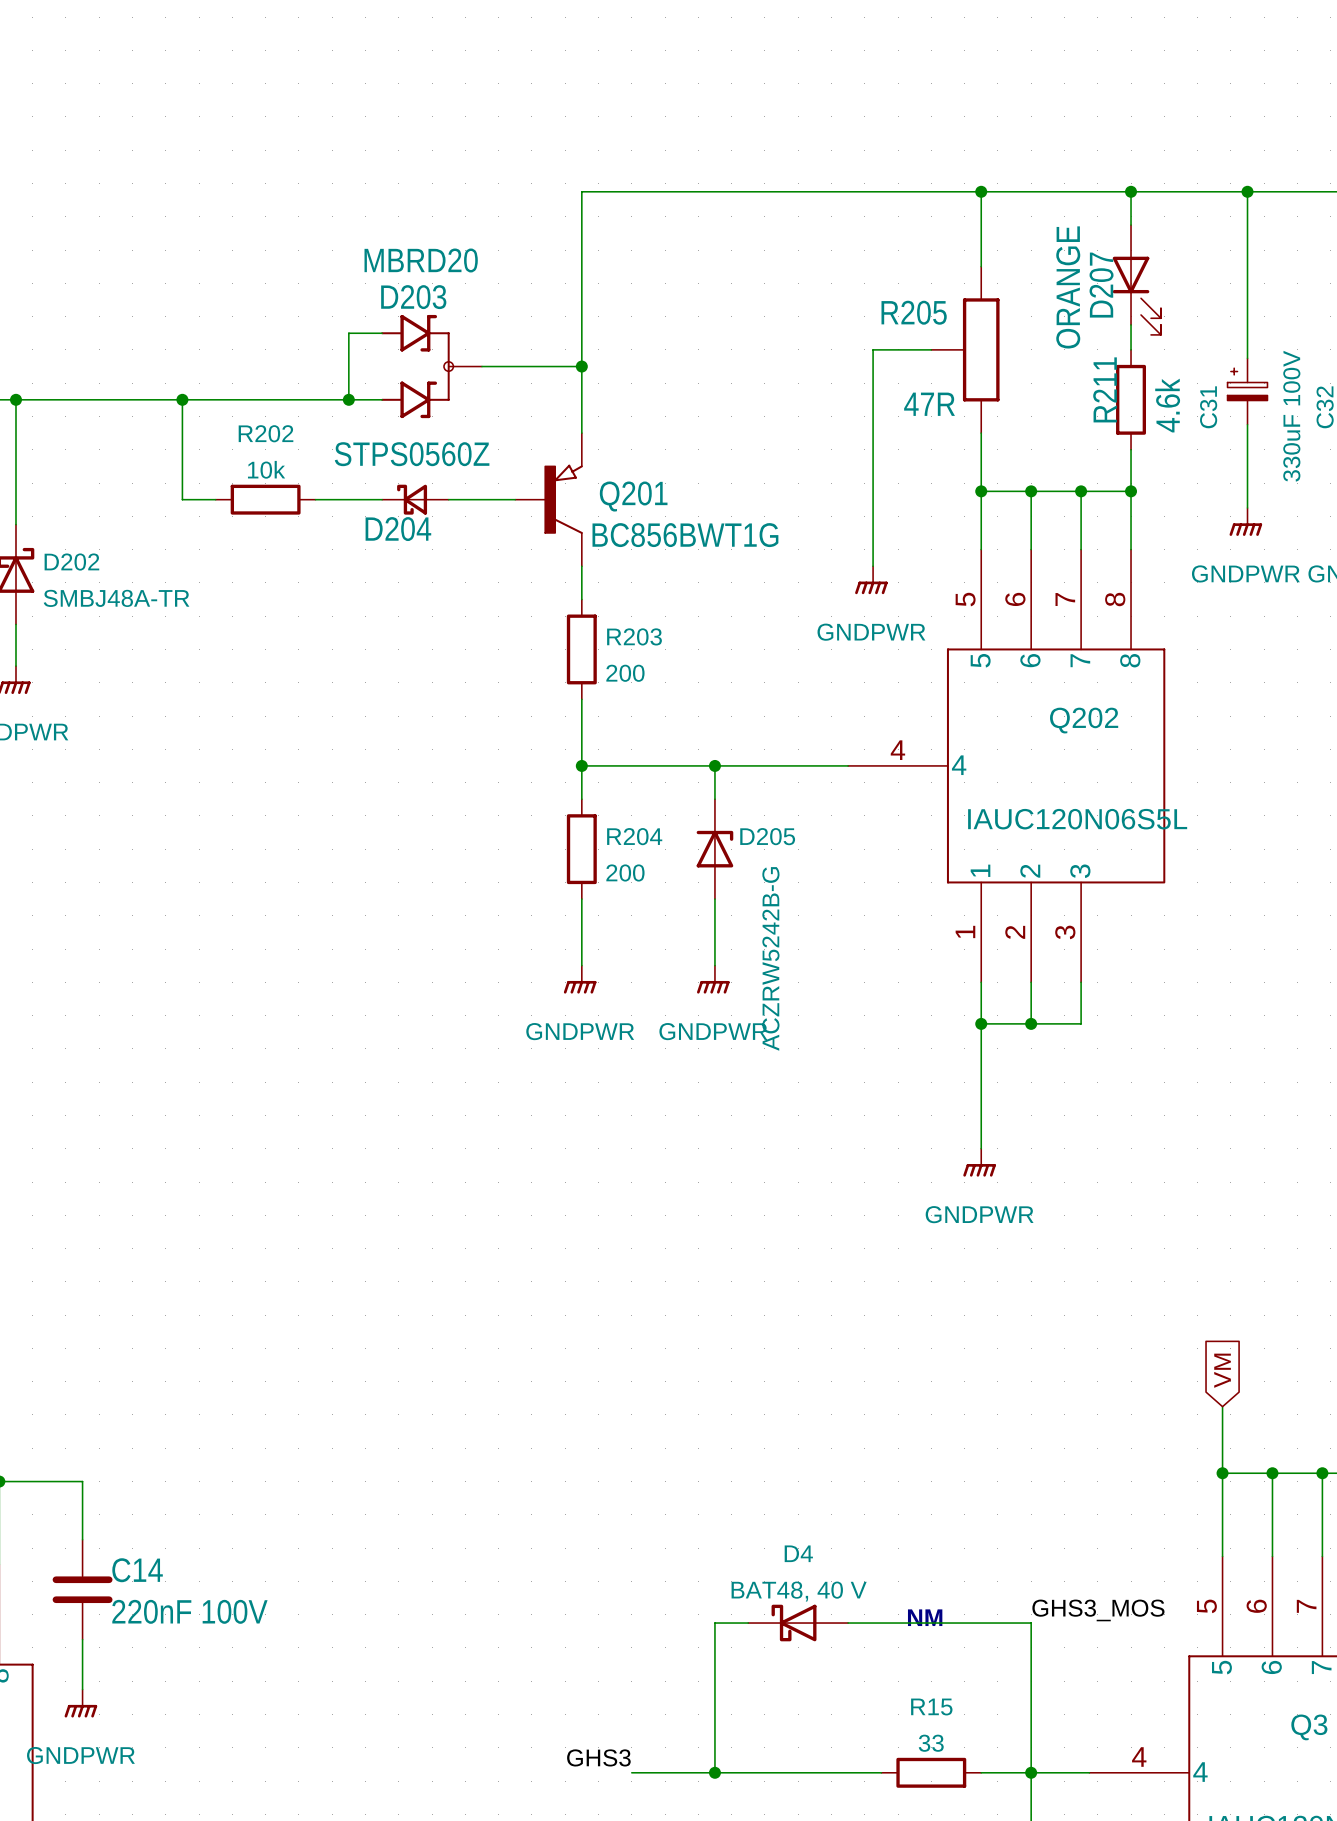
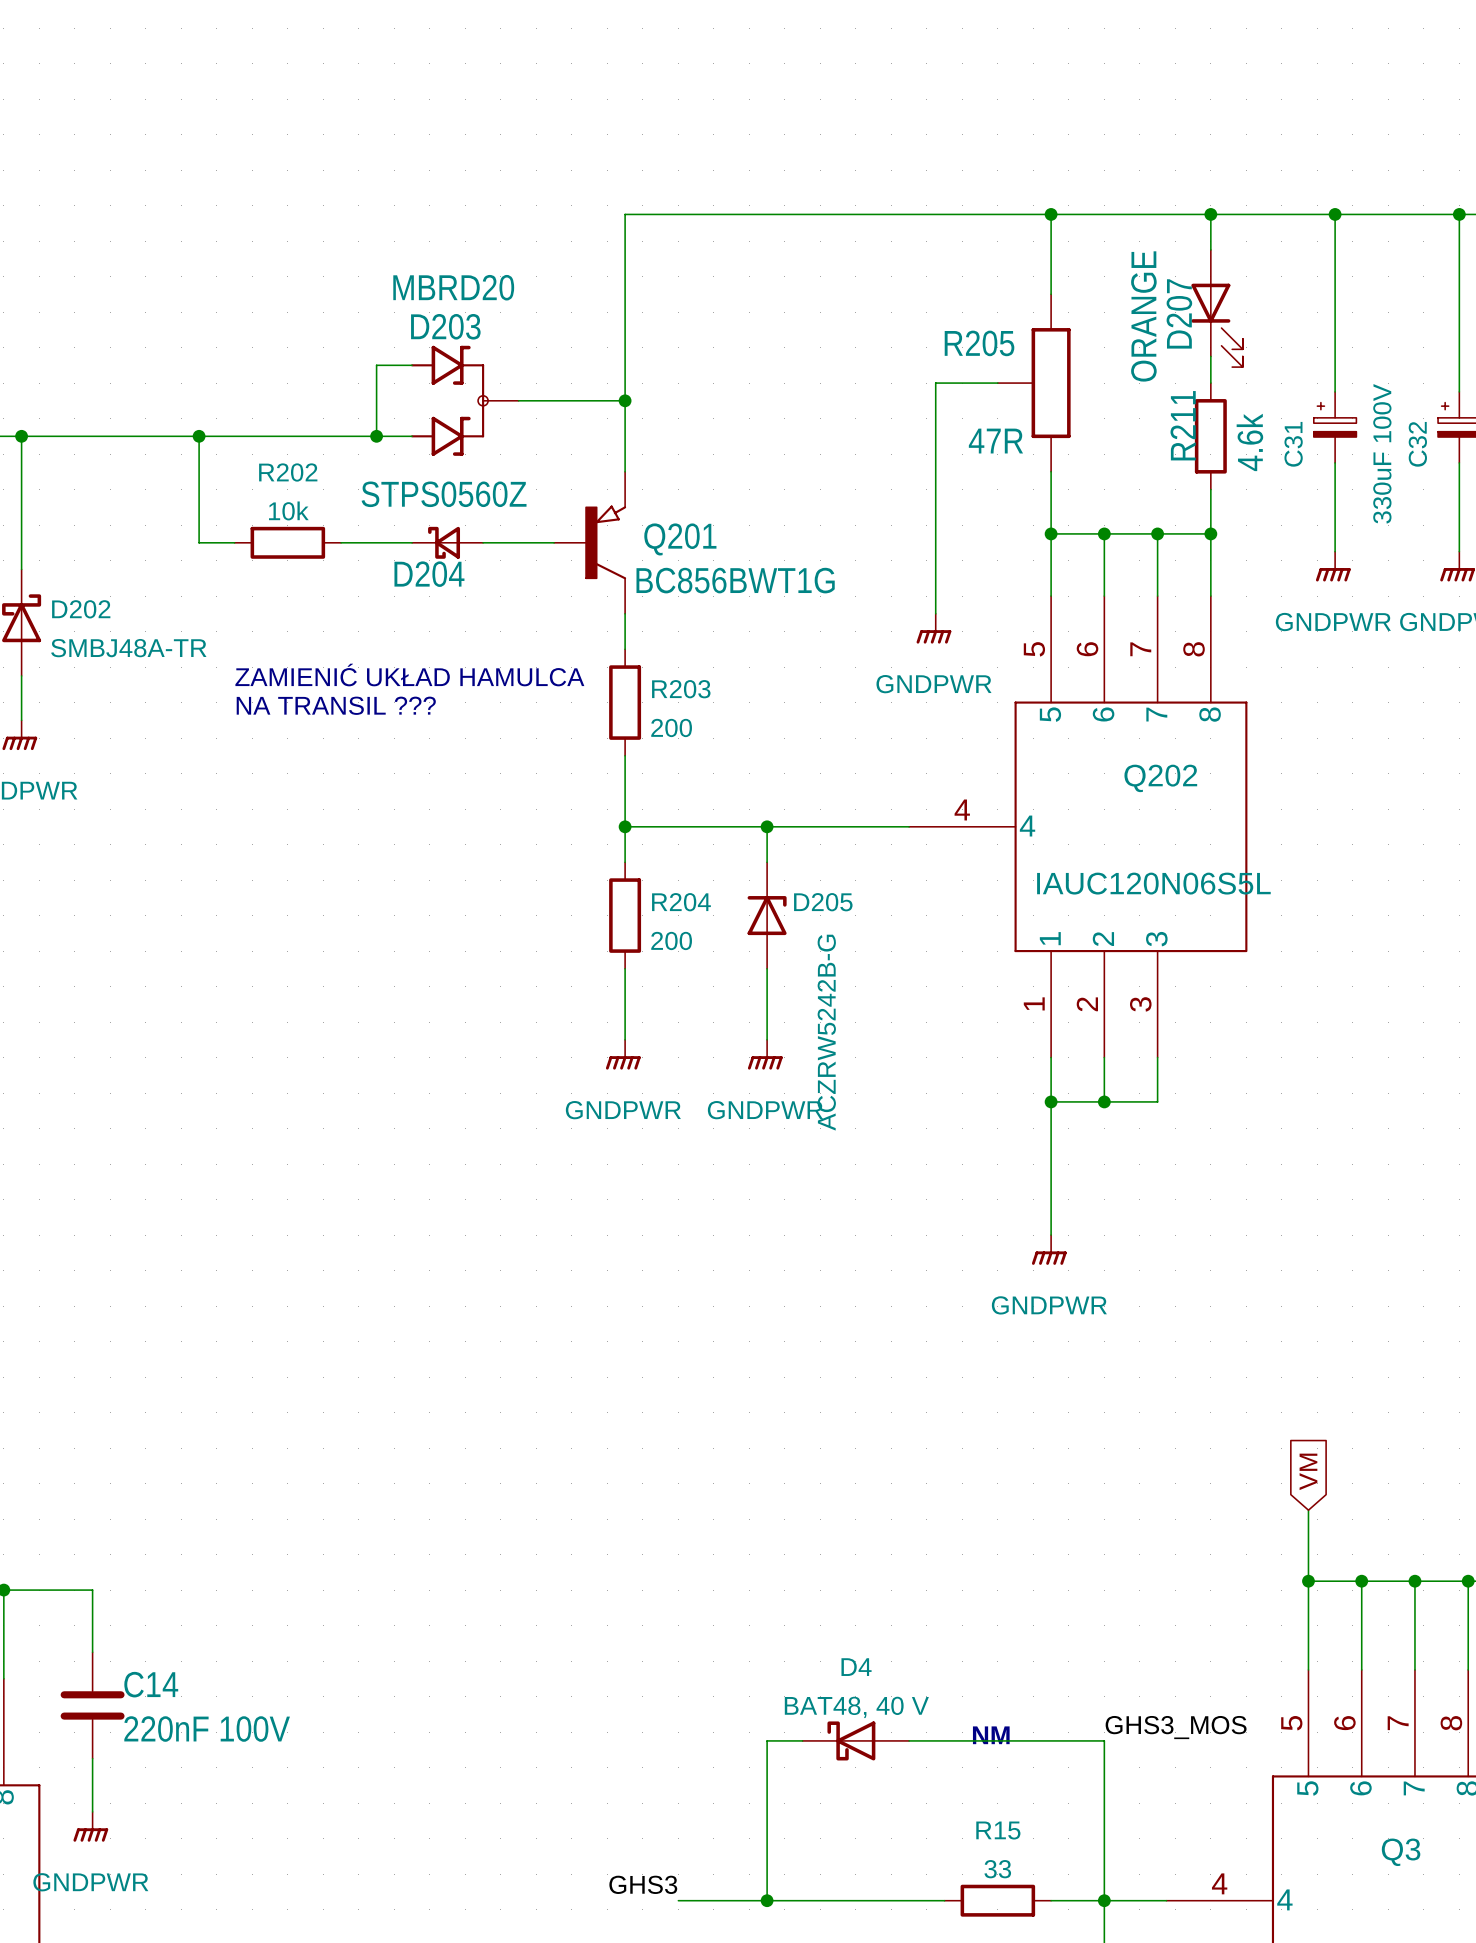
text: none -> ZAMIENIĆ UKŁAD HAMULCA (409, 675)
text: none -> NA TRANSIL ??? (336, 705)

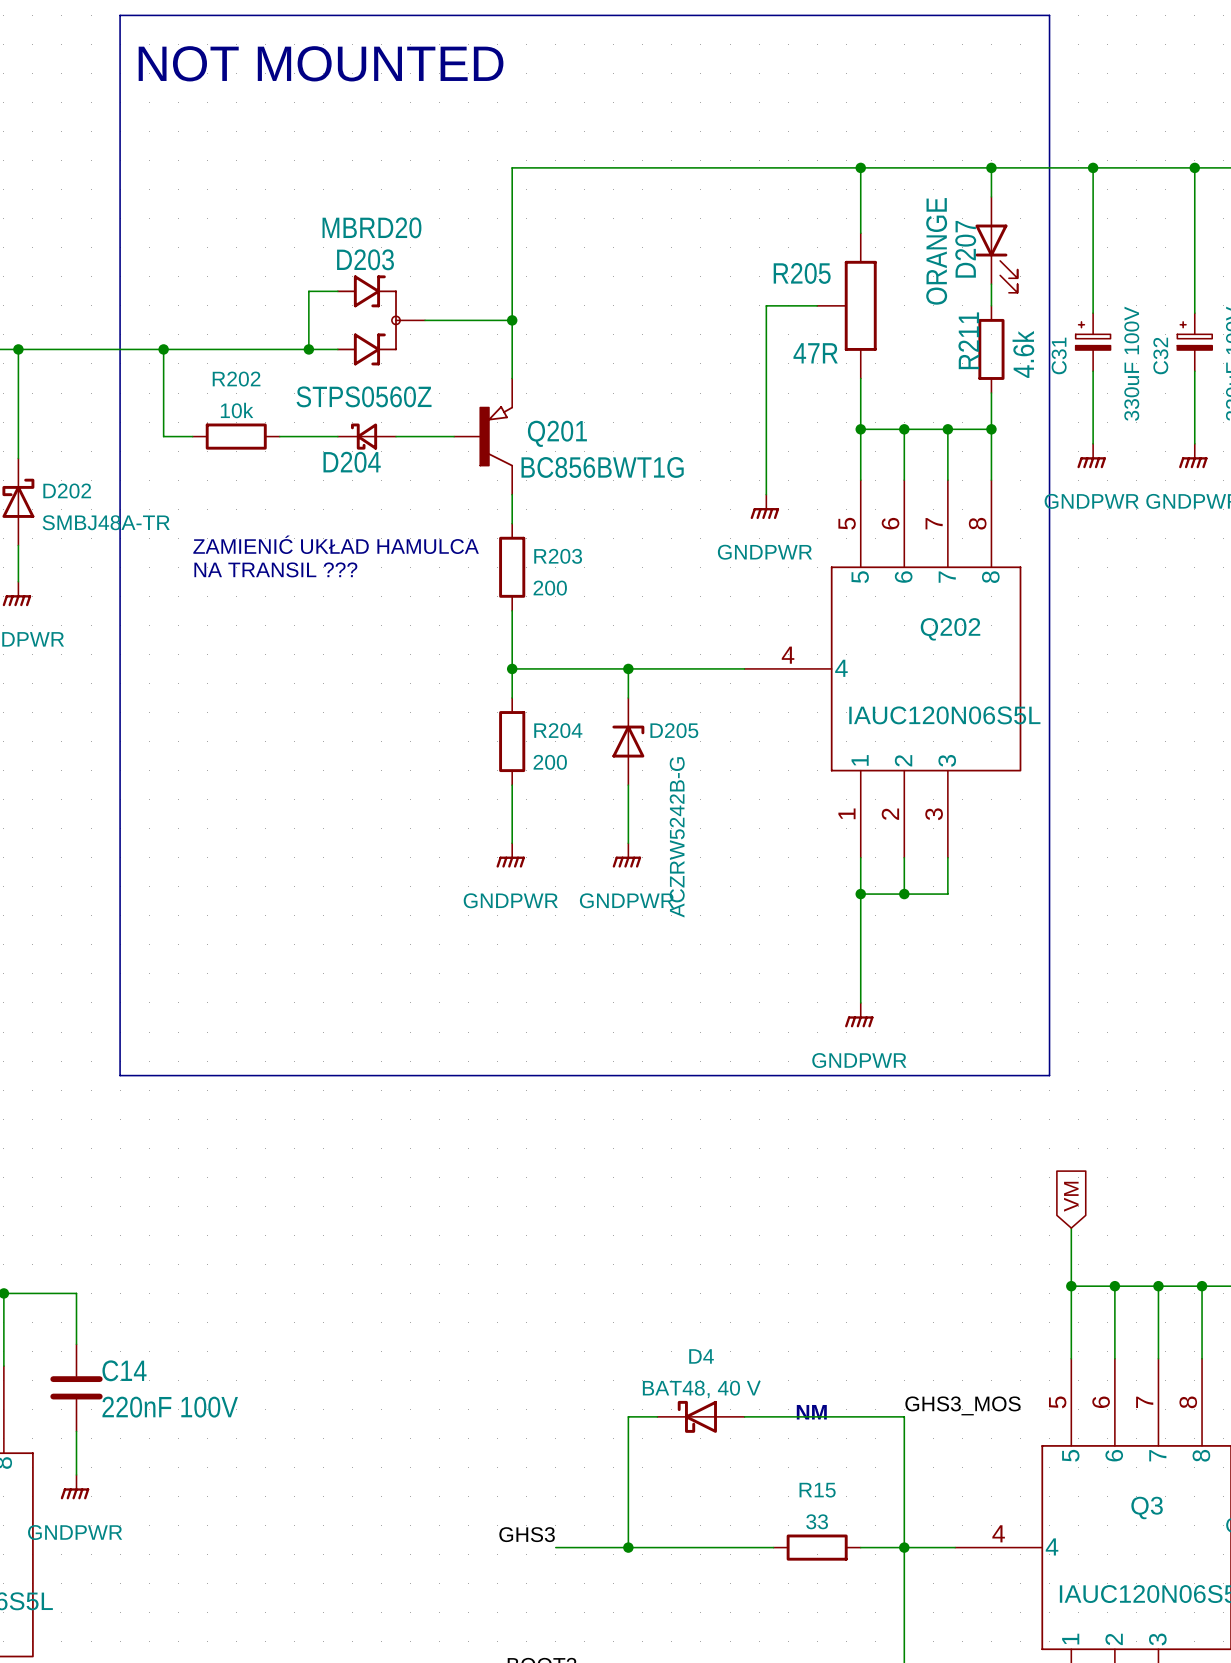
line: none -> (120, 15) (120, 1075) (1049, 1075) (1049, 15) (120, 15)
text: none -> NOT MOUNTED (321, 63)

